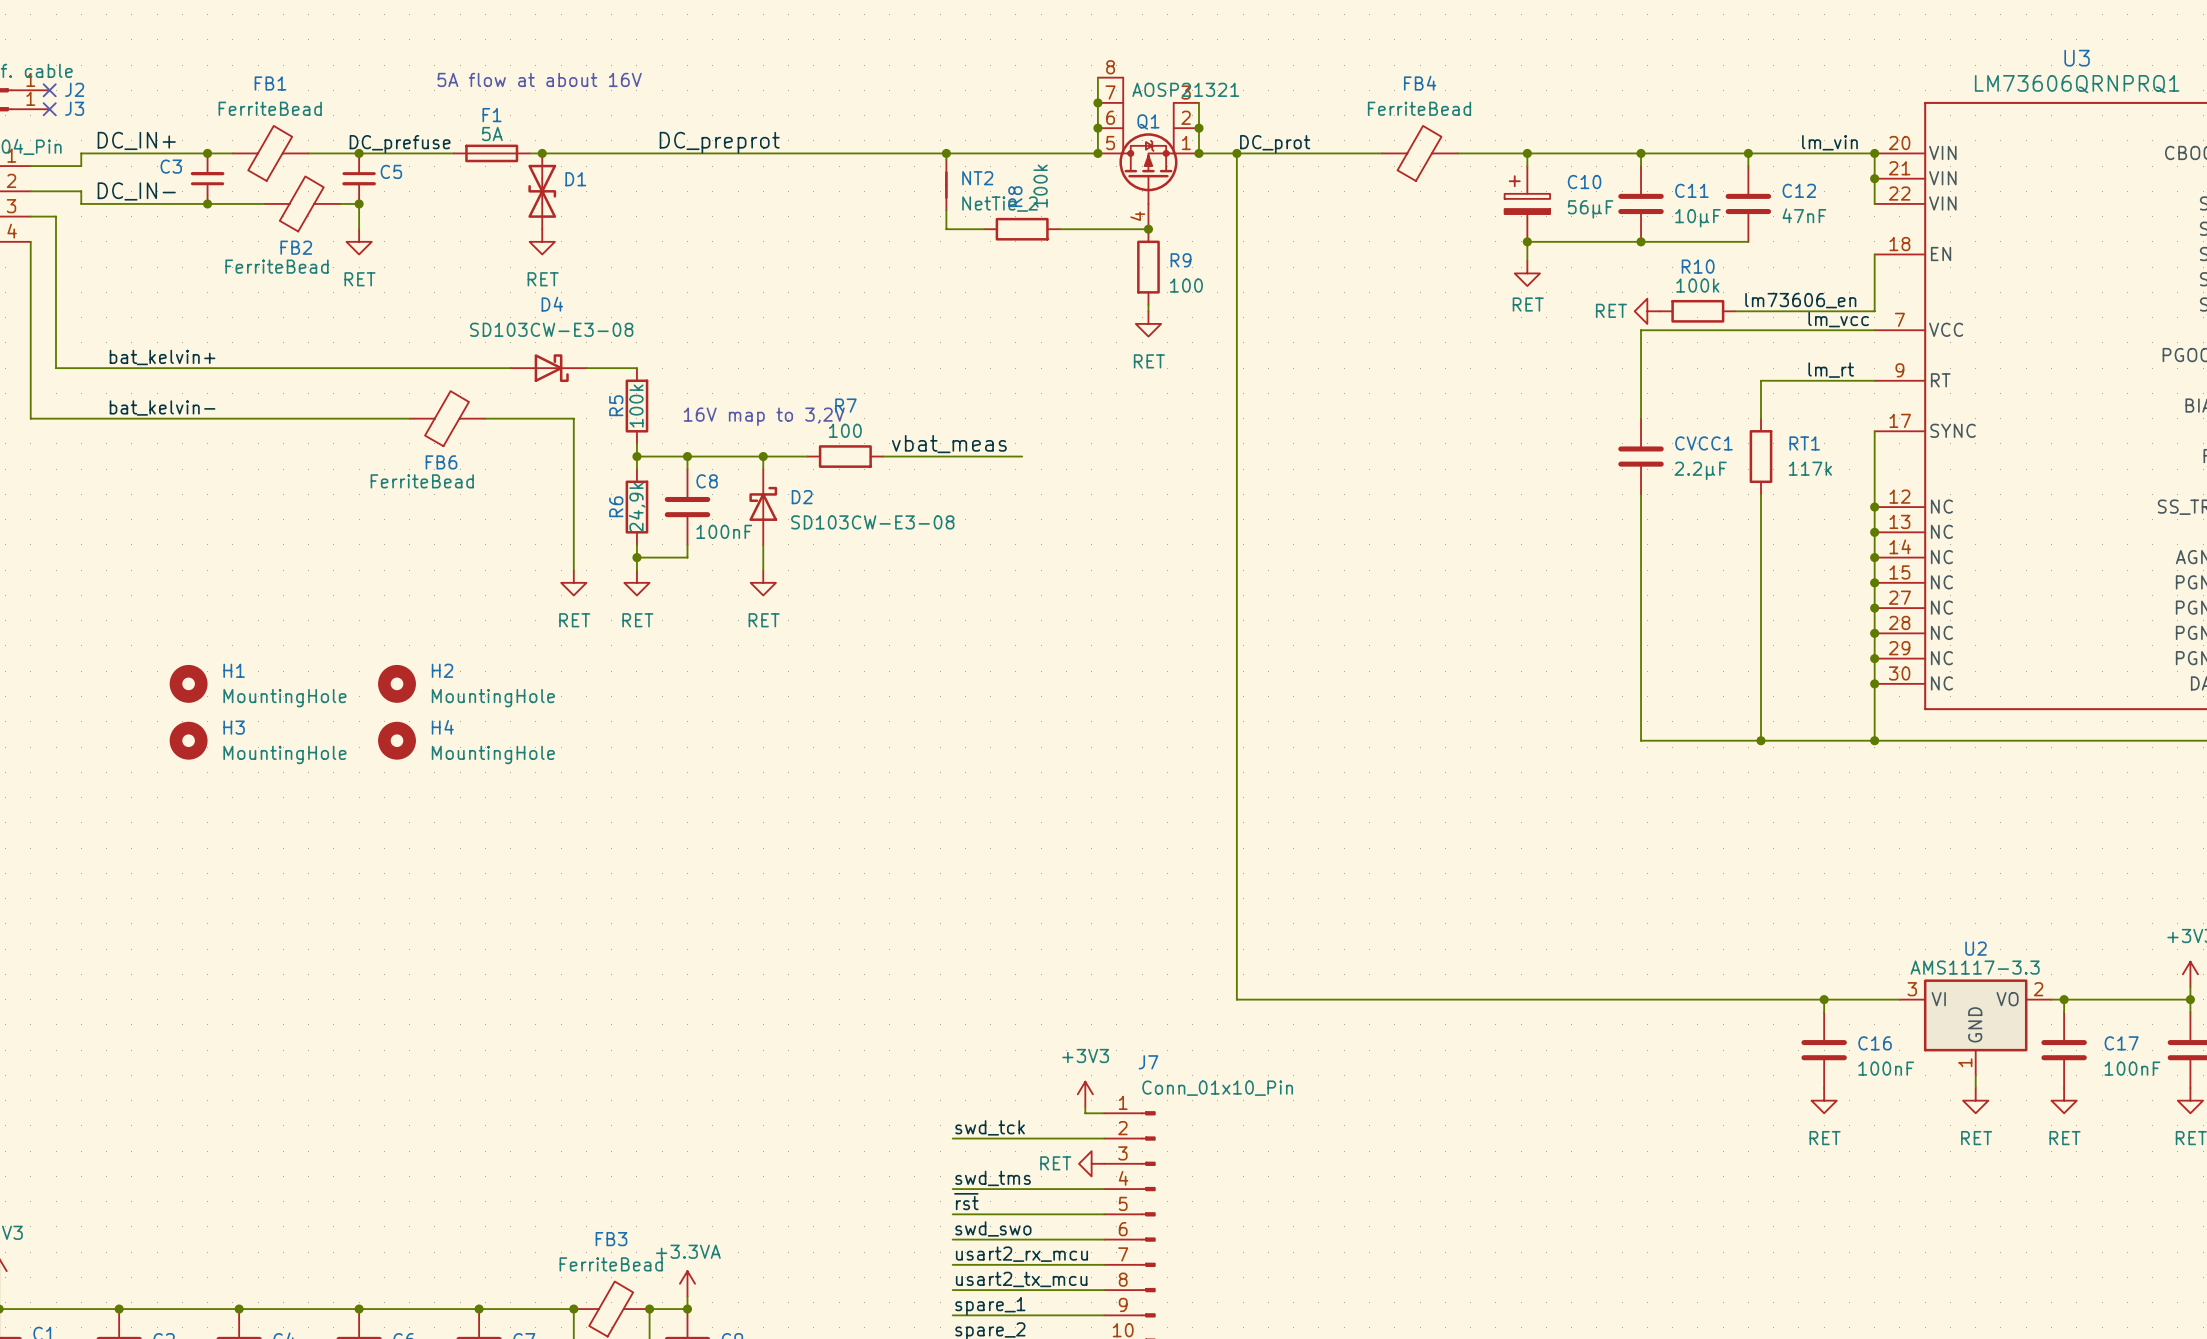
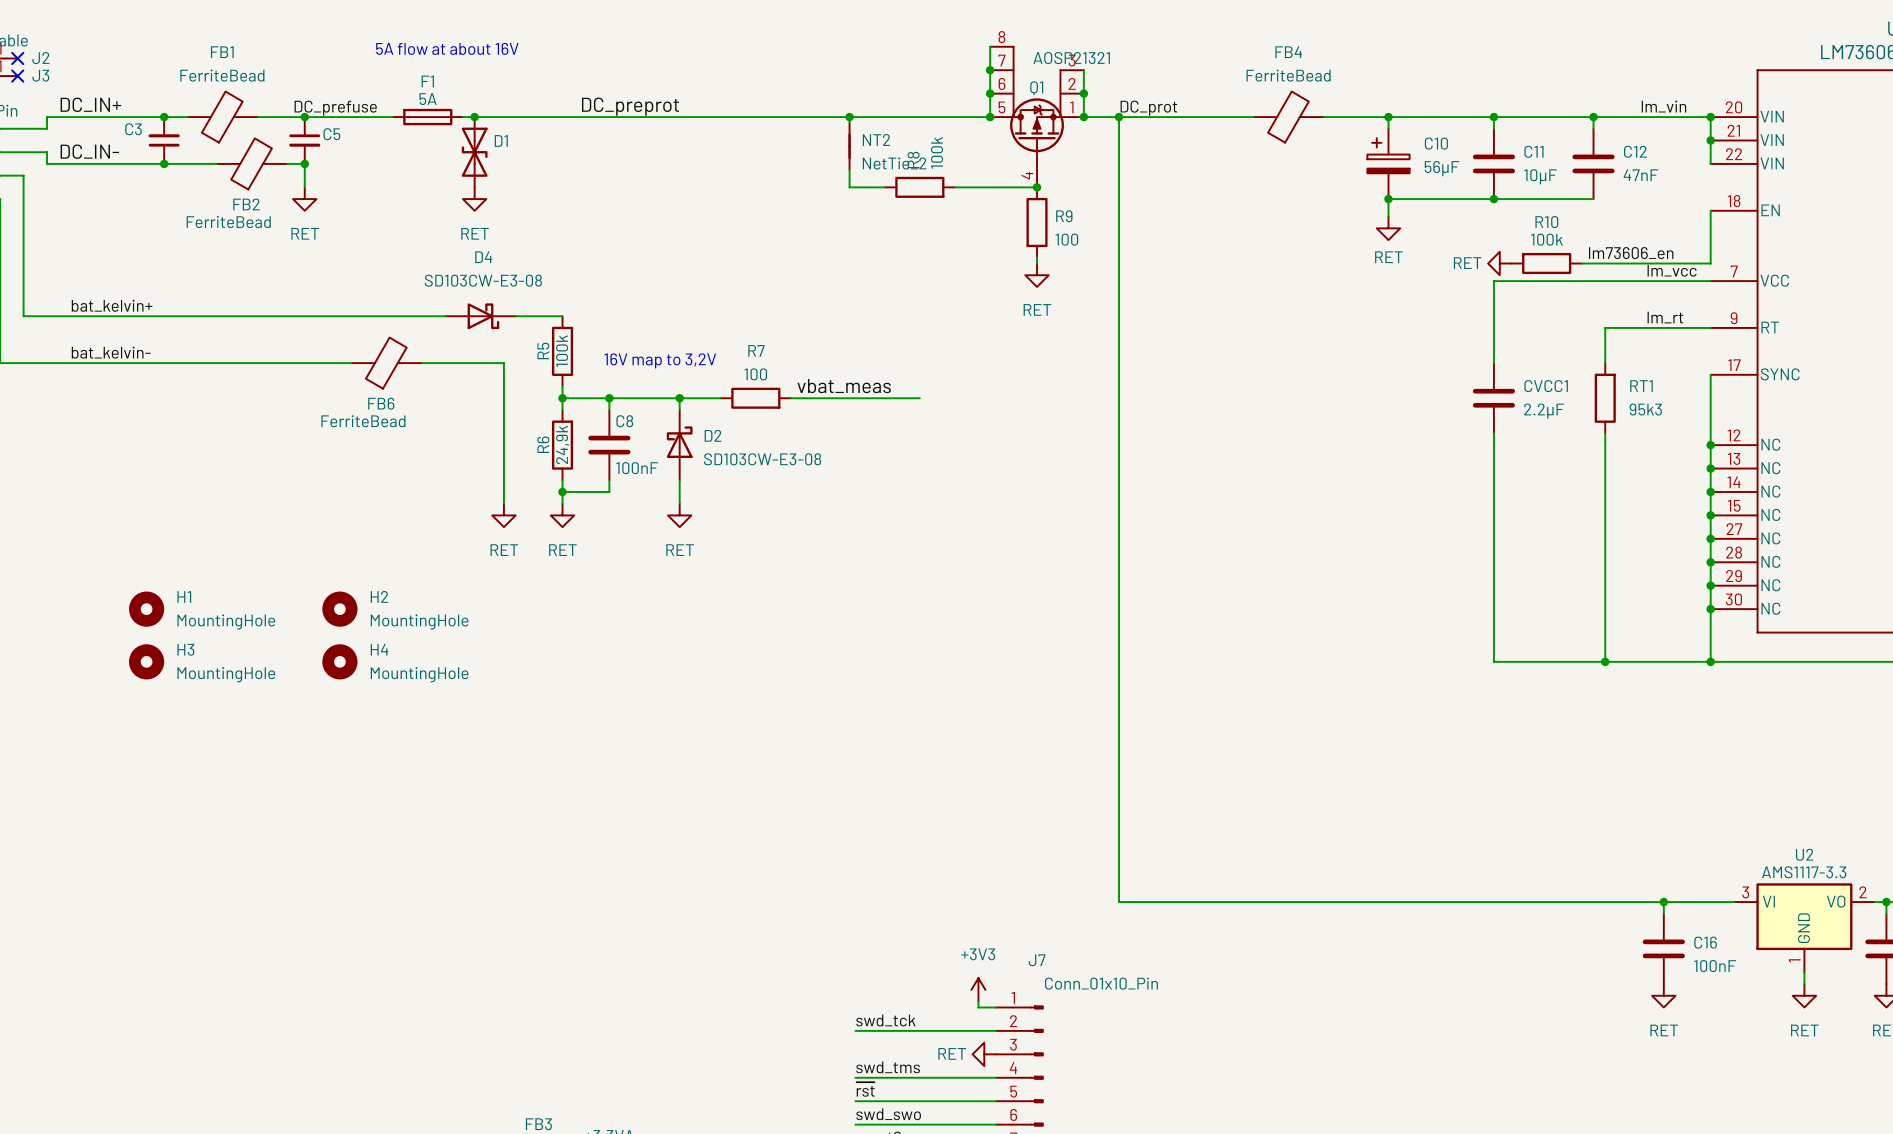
RT1 value: 117k (1810, 468) -> 95k3 (1645, 409)

